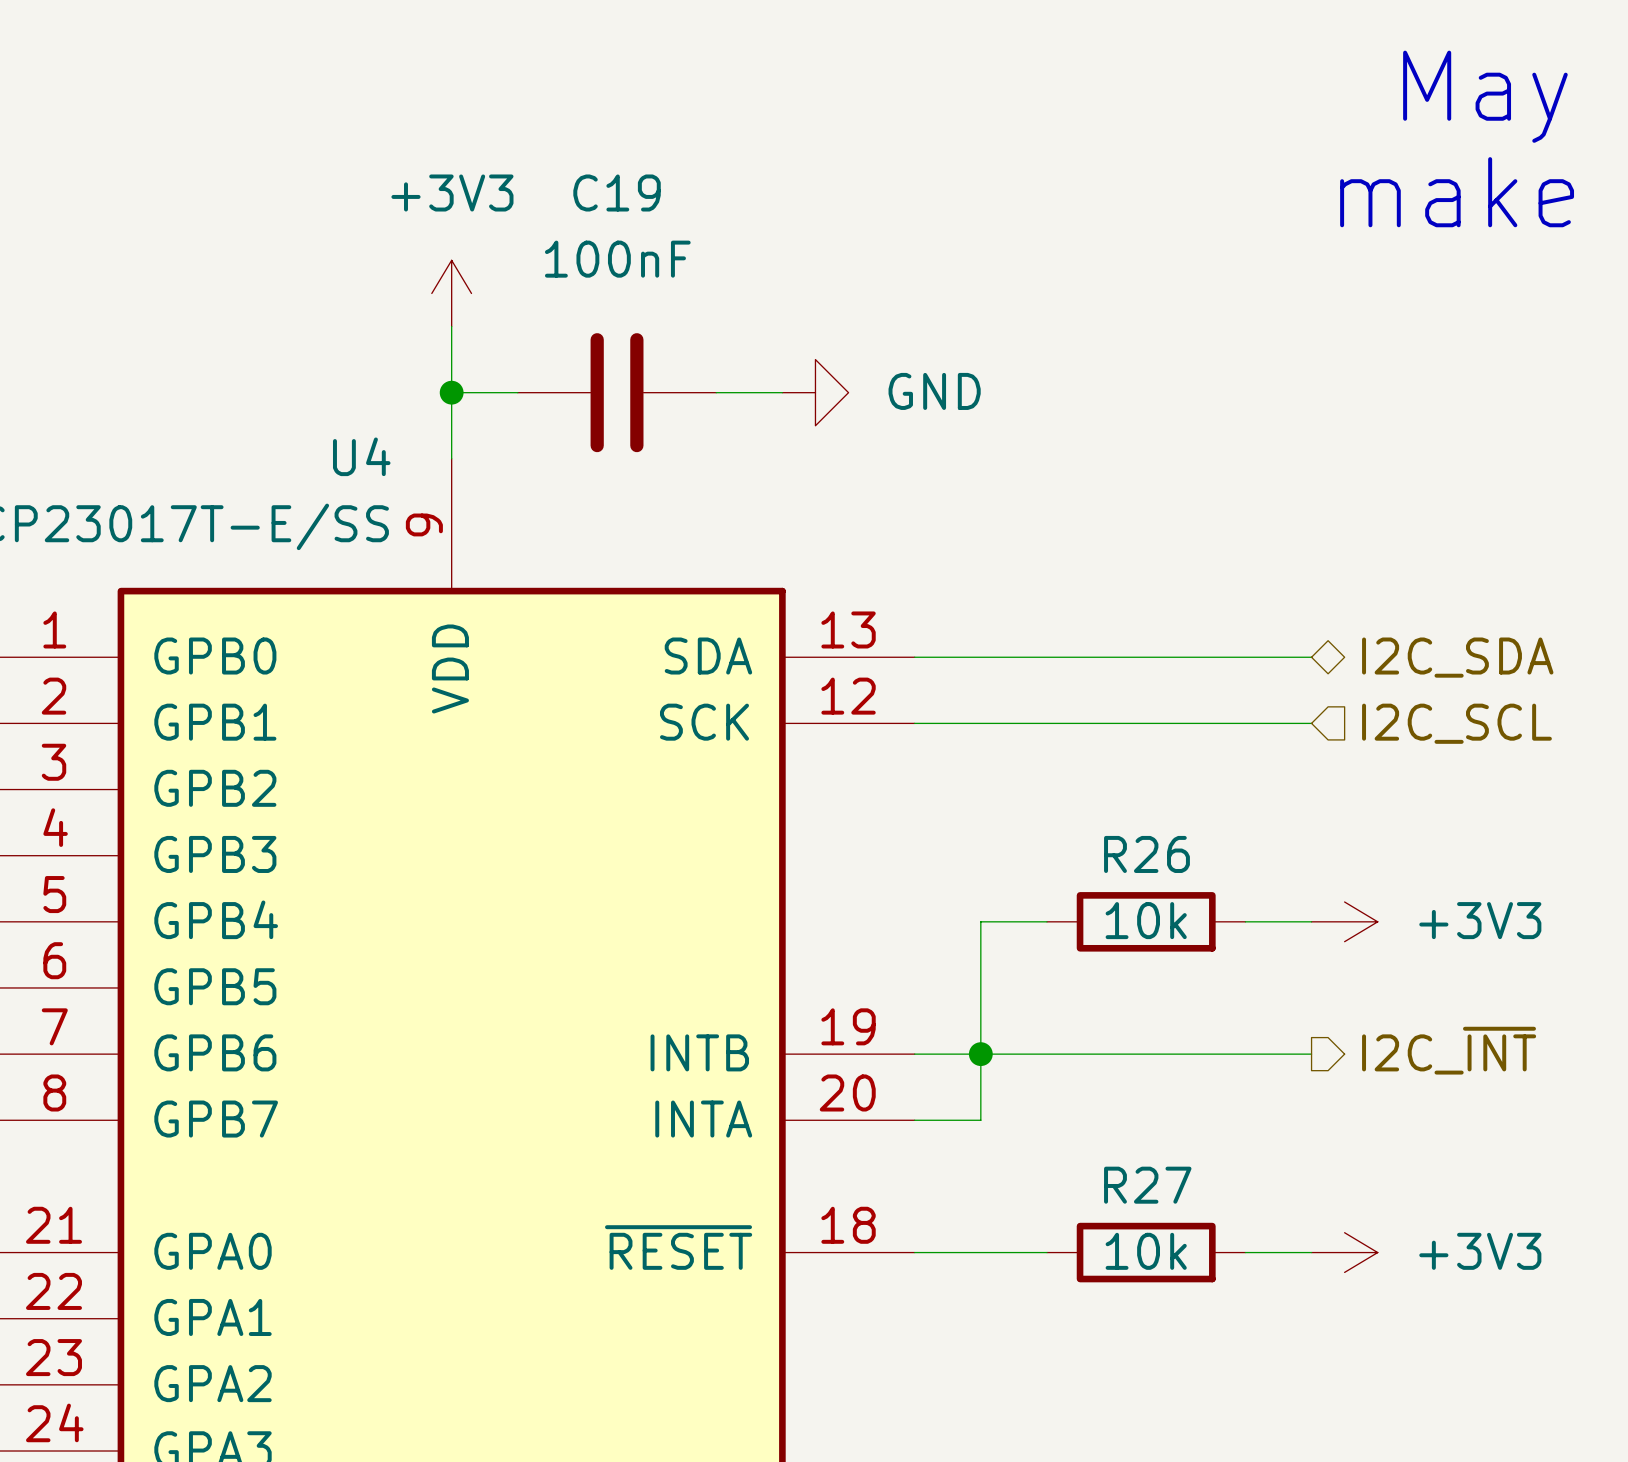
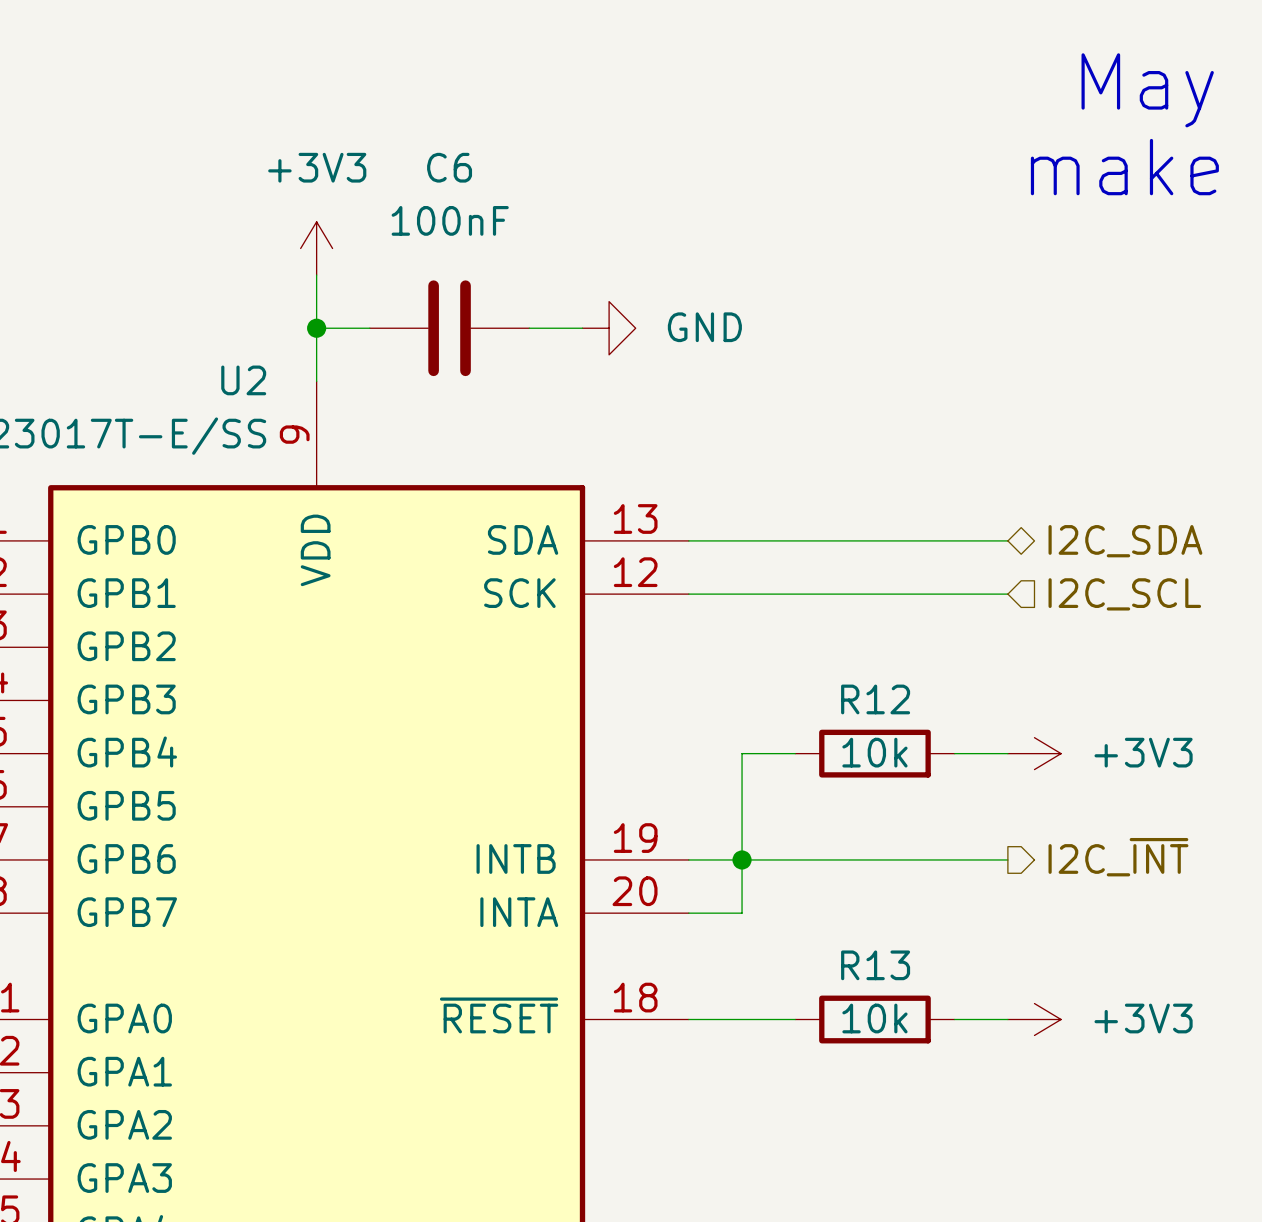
C19 name: C19 (617, 193) -> C6 (449, 167)
U4 name: U4 (361, 456) -> U2 (243, 380)
R26 name: R26 (1146, 854) -> R12 (875, 699)
R27 name: R27 (1147, 1185) -> R13 (875, 965)

